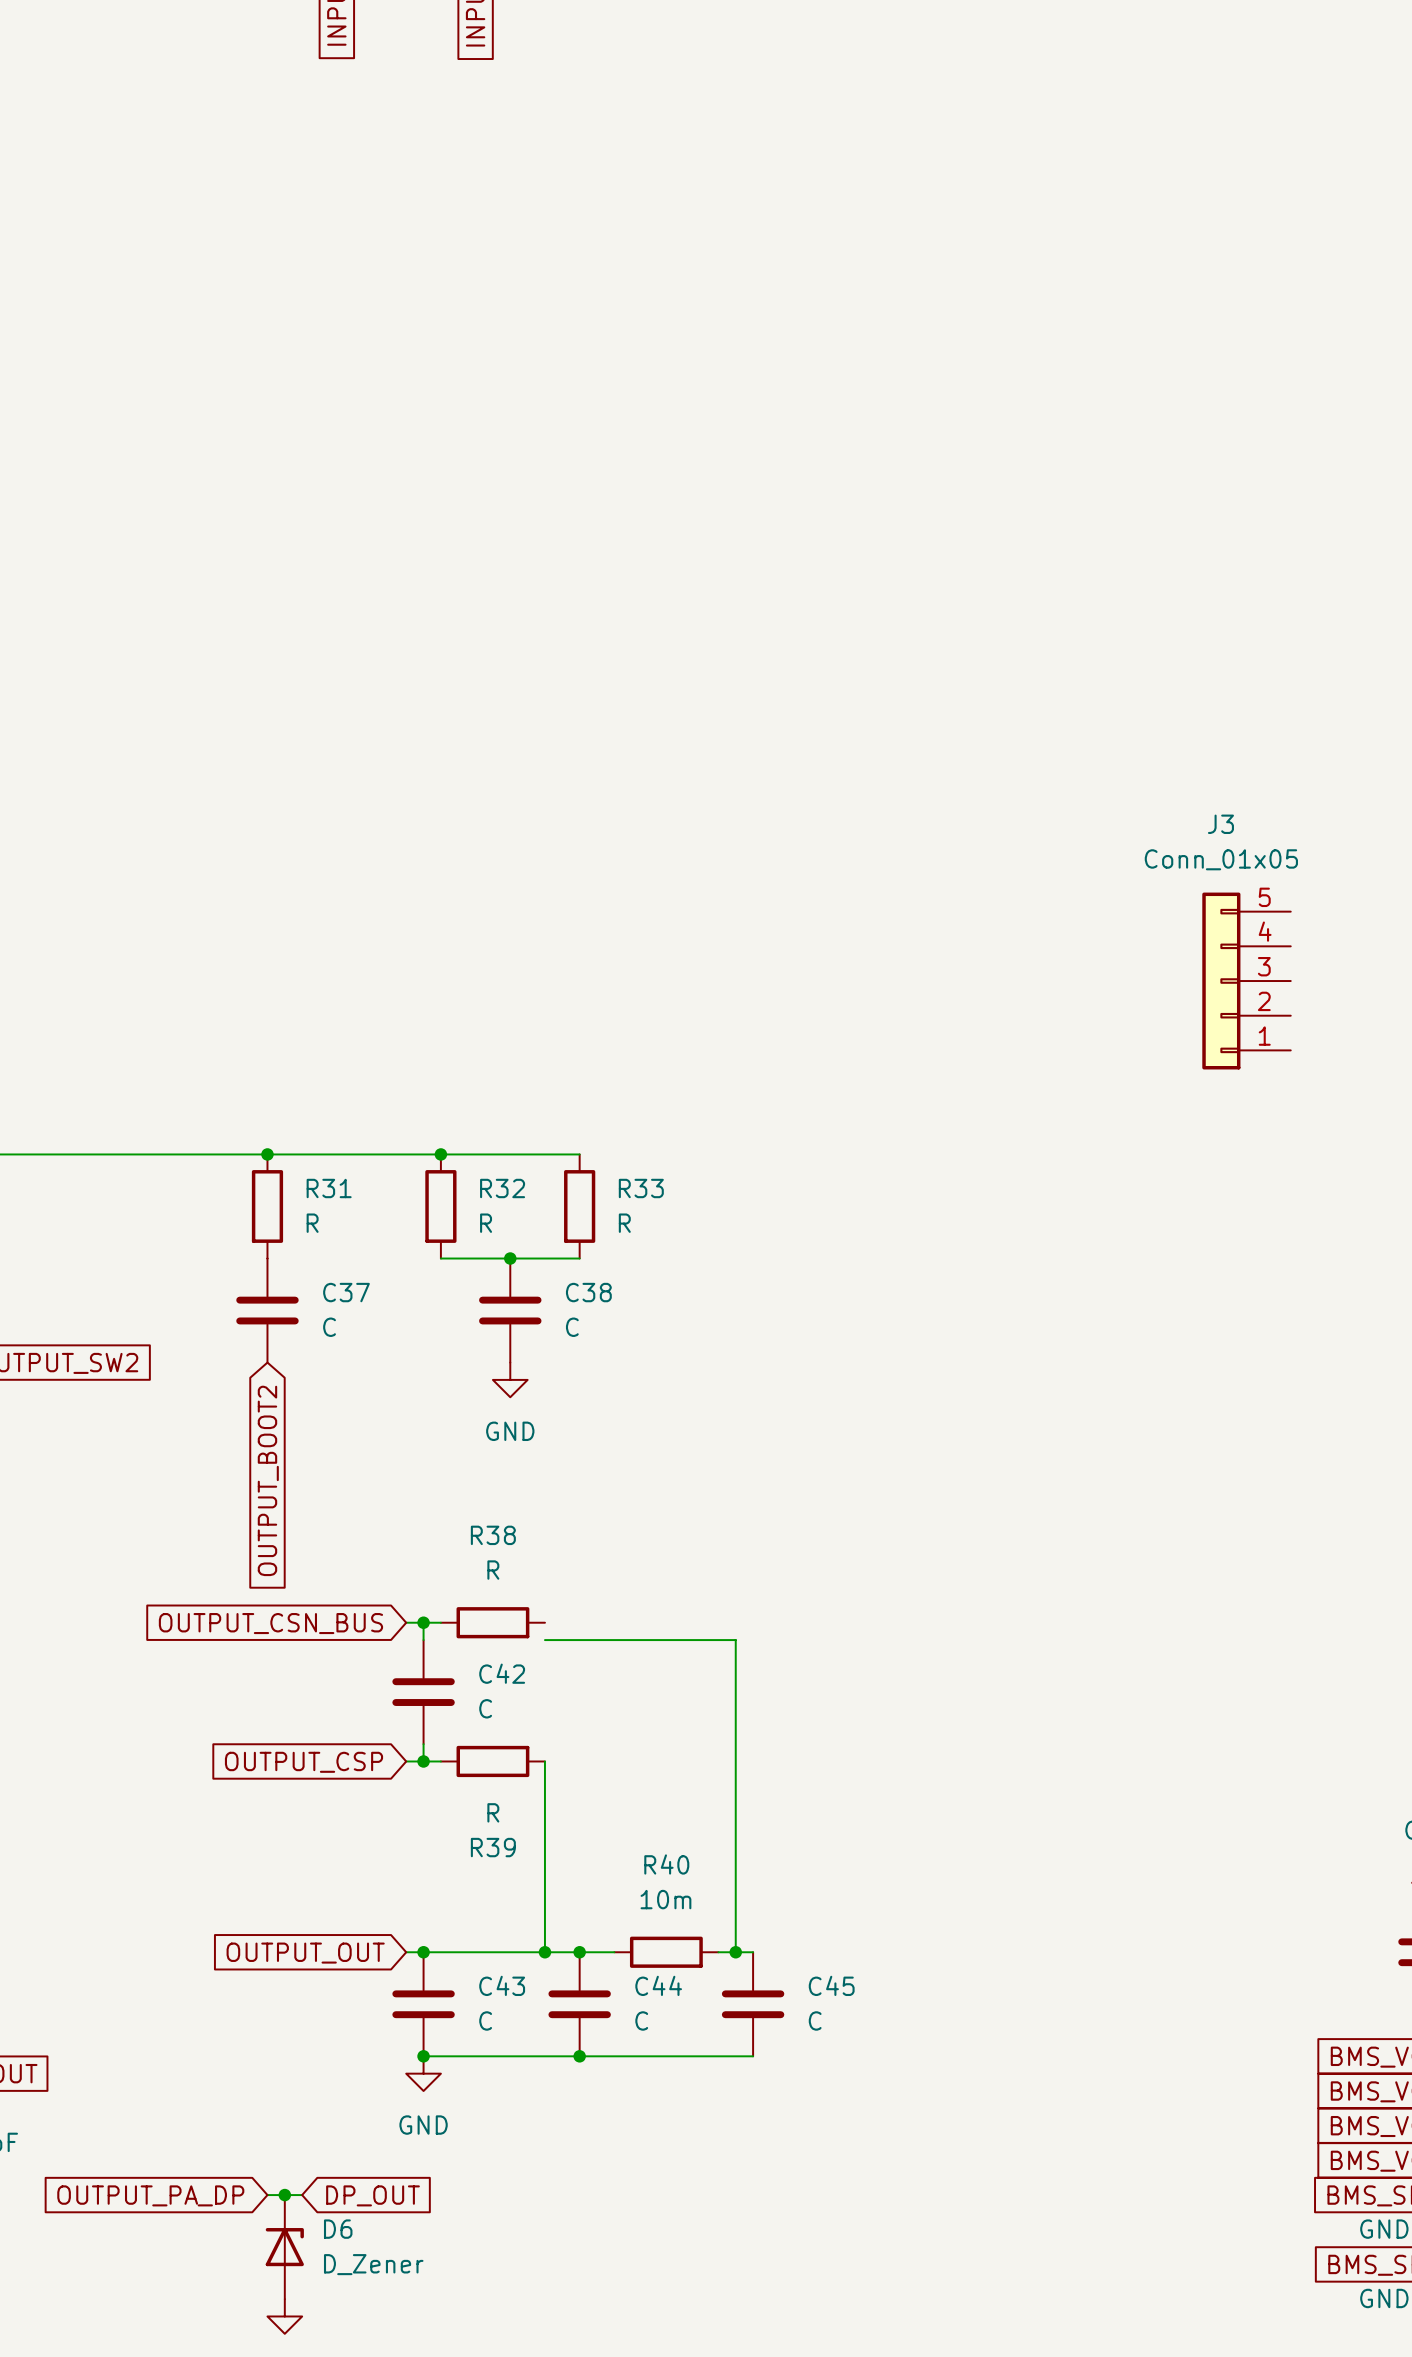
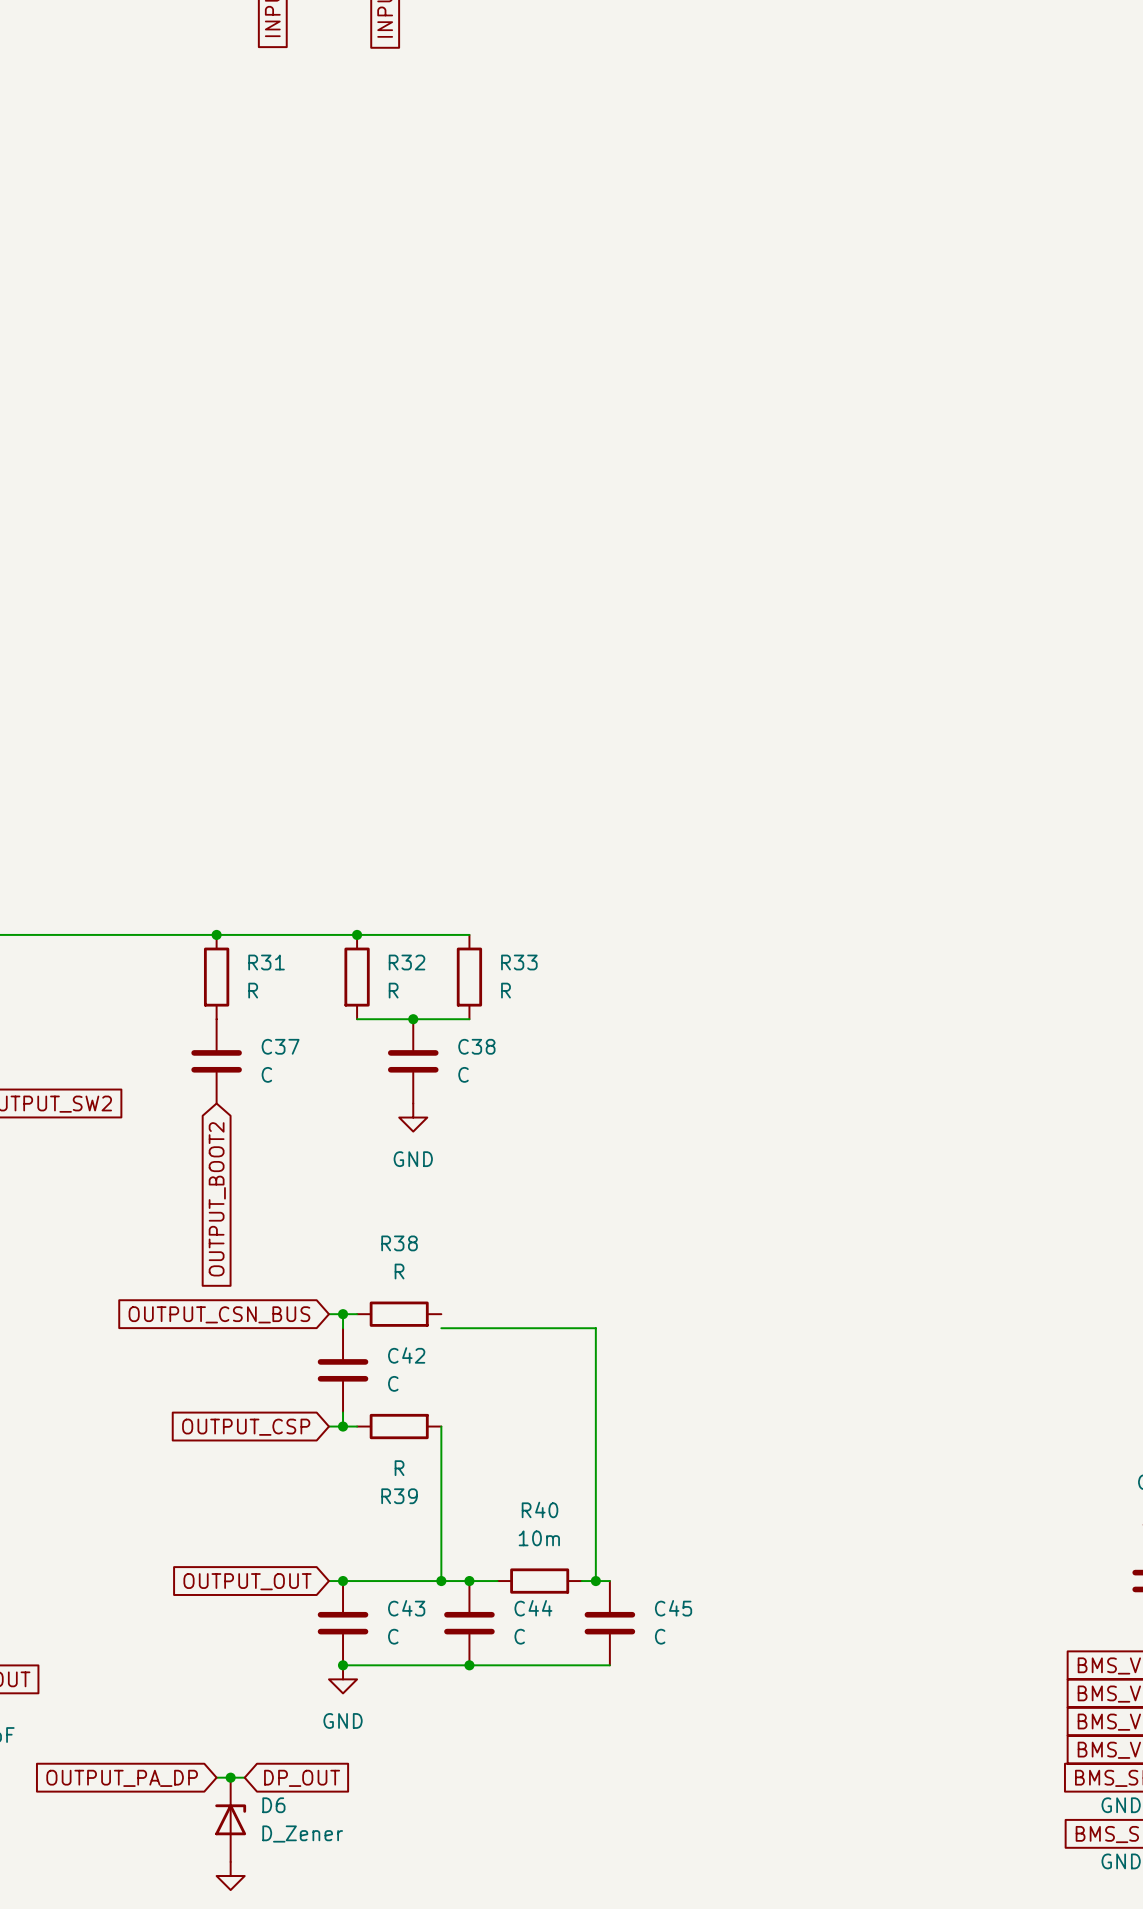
J3: Conn_01x05 (1246, 981) -> none

